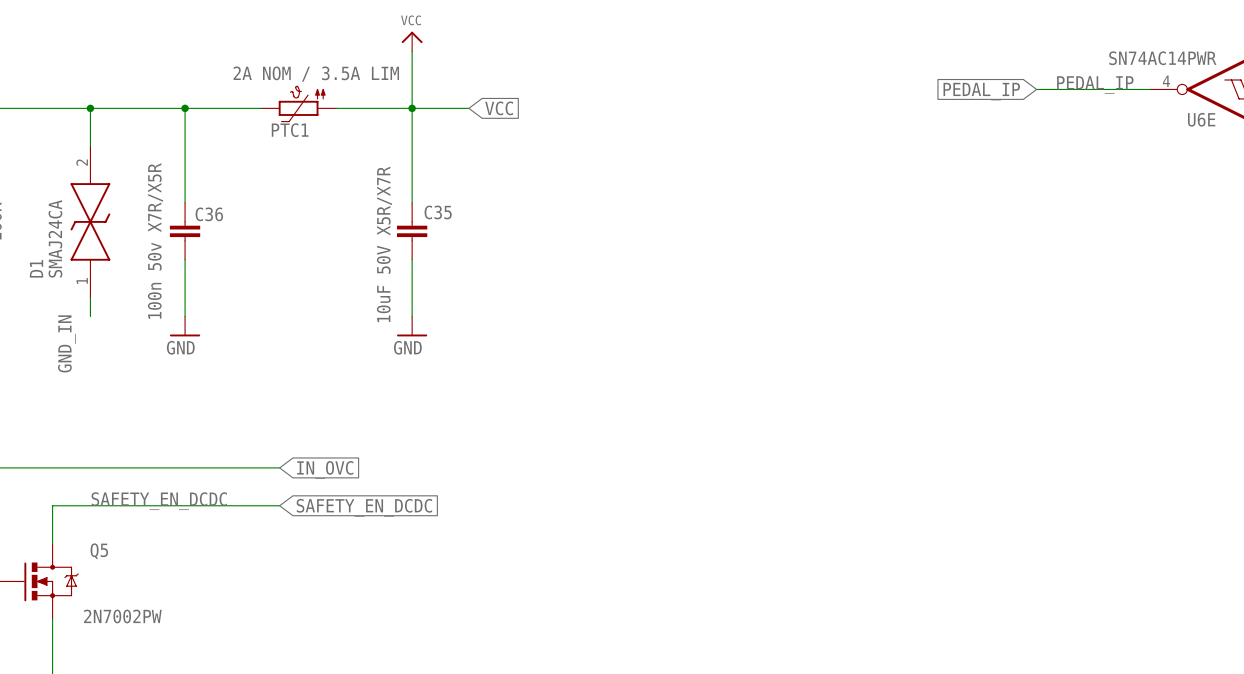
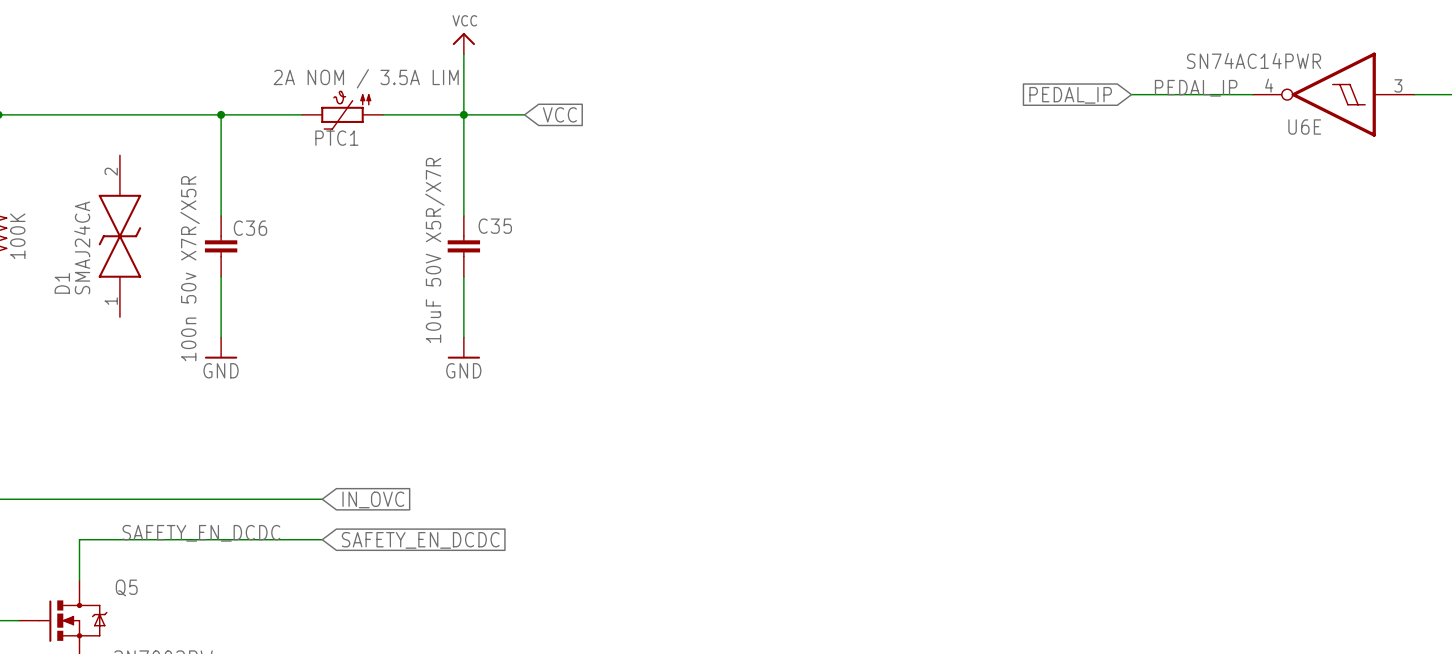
wire: (90, 108) (90, 146) -> none
junction: (90, 108) -> none
wire: (90, 297) (90, 316) -> none
label: GND_IN (66, 343) -> none

